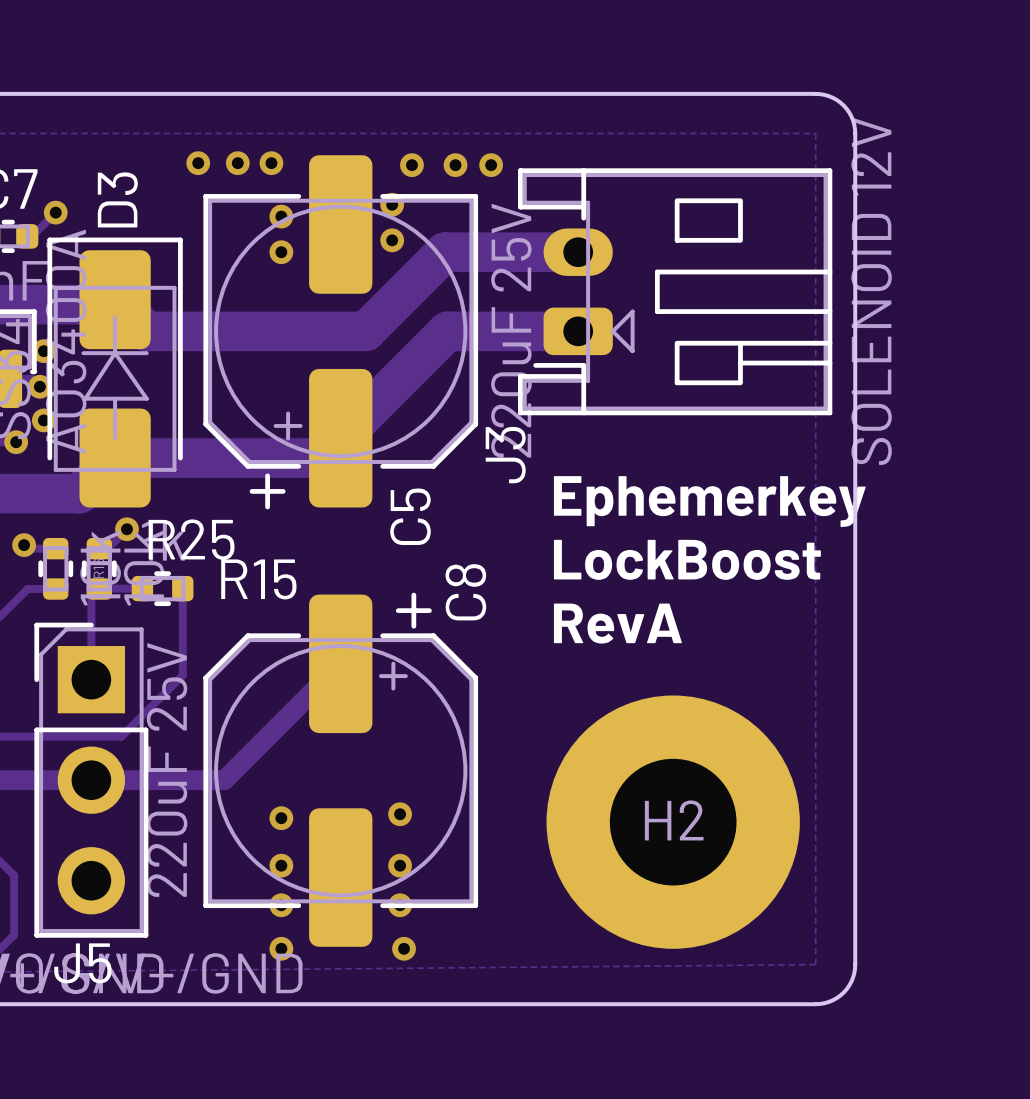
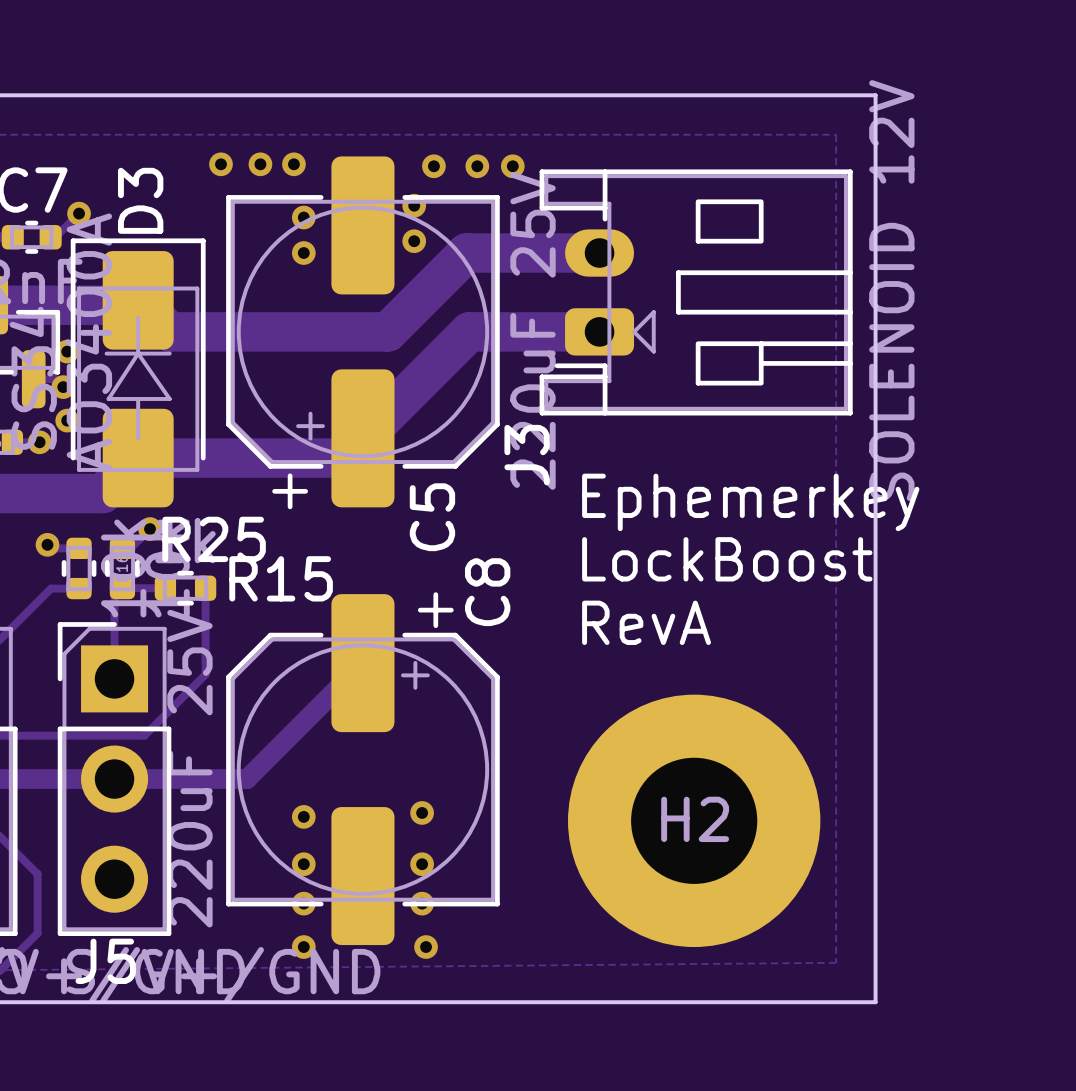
board edge: (815, 93) (828, 96) (843, 105) (853, 120) (855, 133) -> (836, 95) (875, 95) (875, 134)
board edge: (855, 964) (853, 977) (843, 992) (828, 1001) (815, 1004) -> (875, 962) (875, 1002) (836, 1002)

